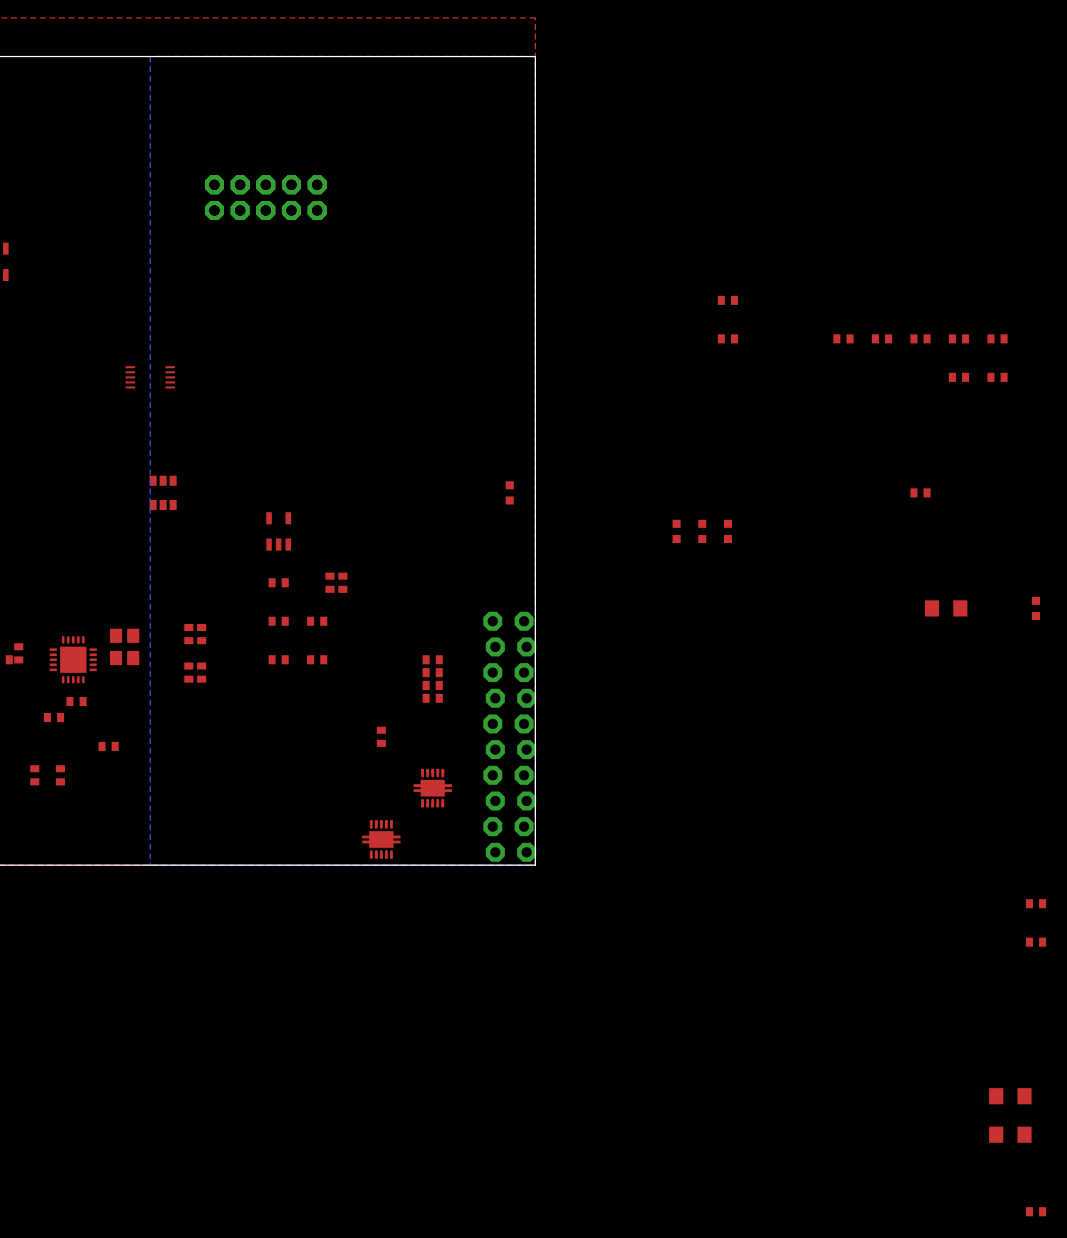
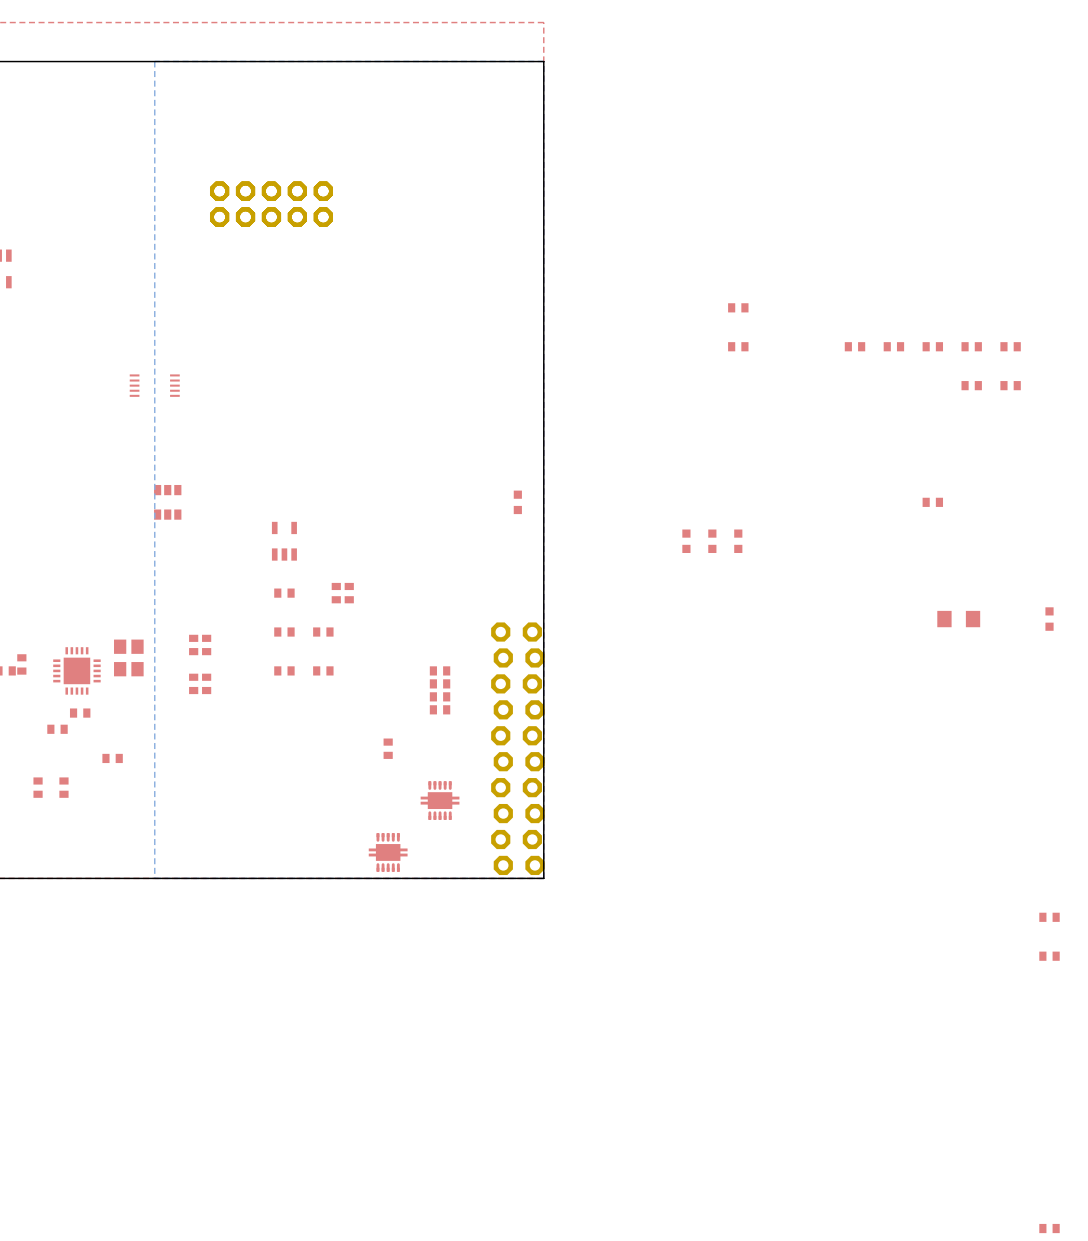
part: (1010, 1096) -> none
part: (1010, 1134) -> none

